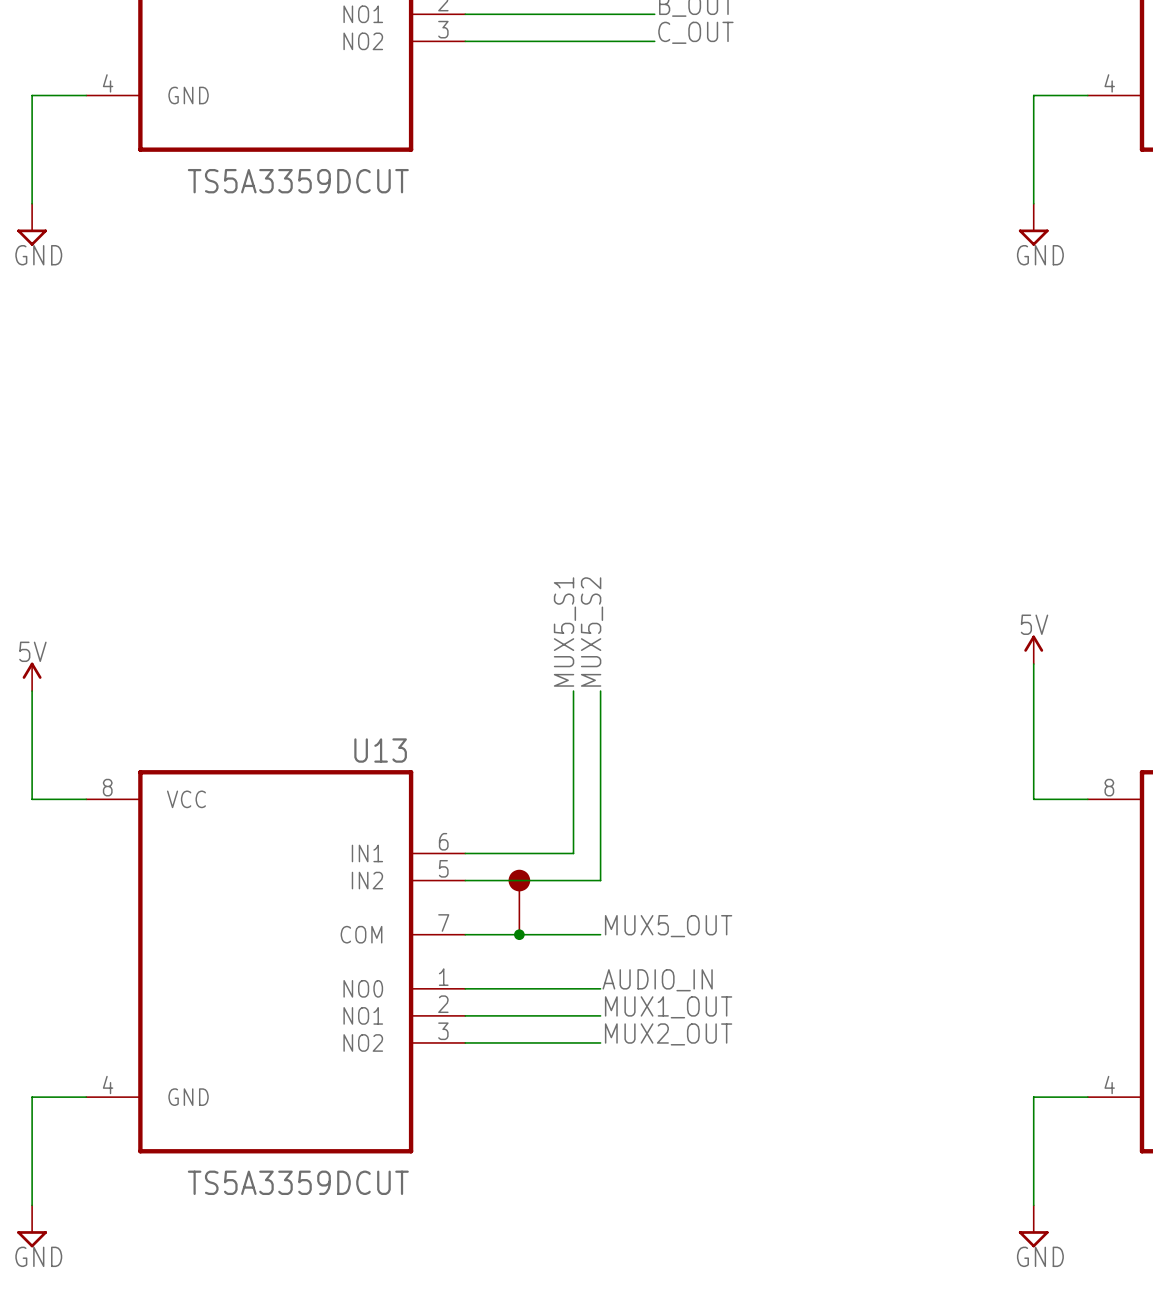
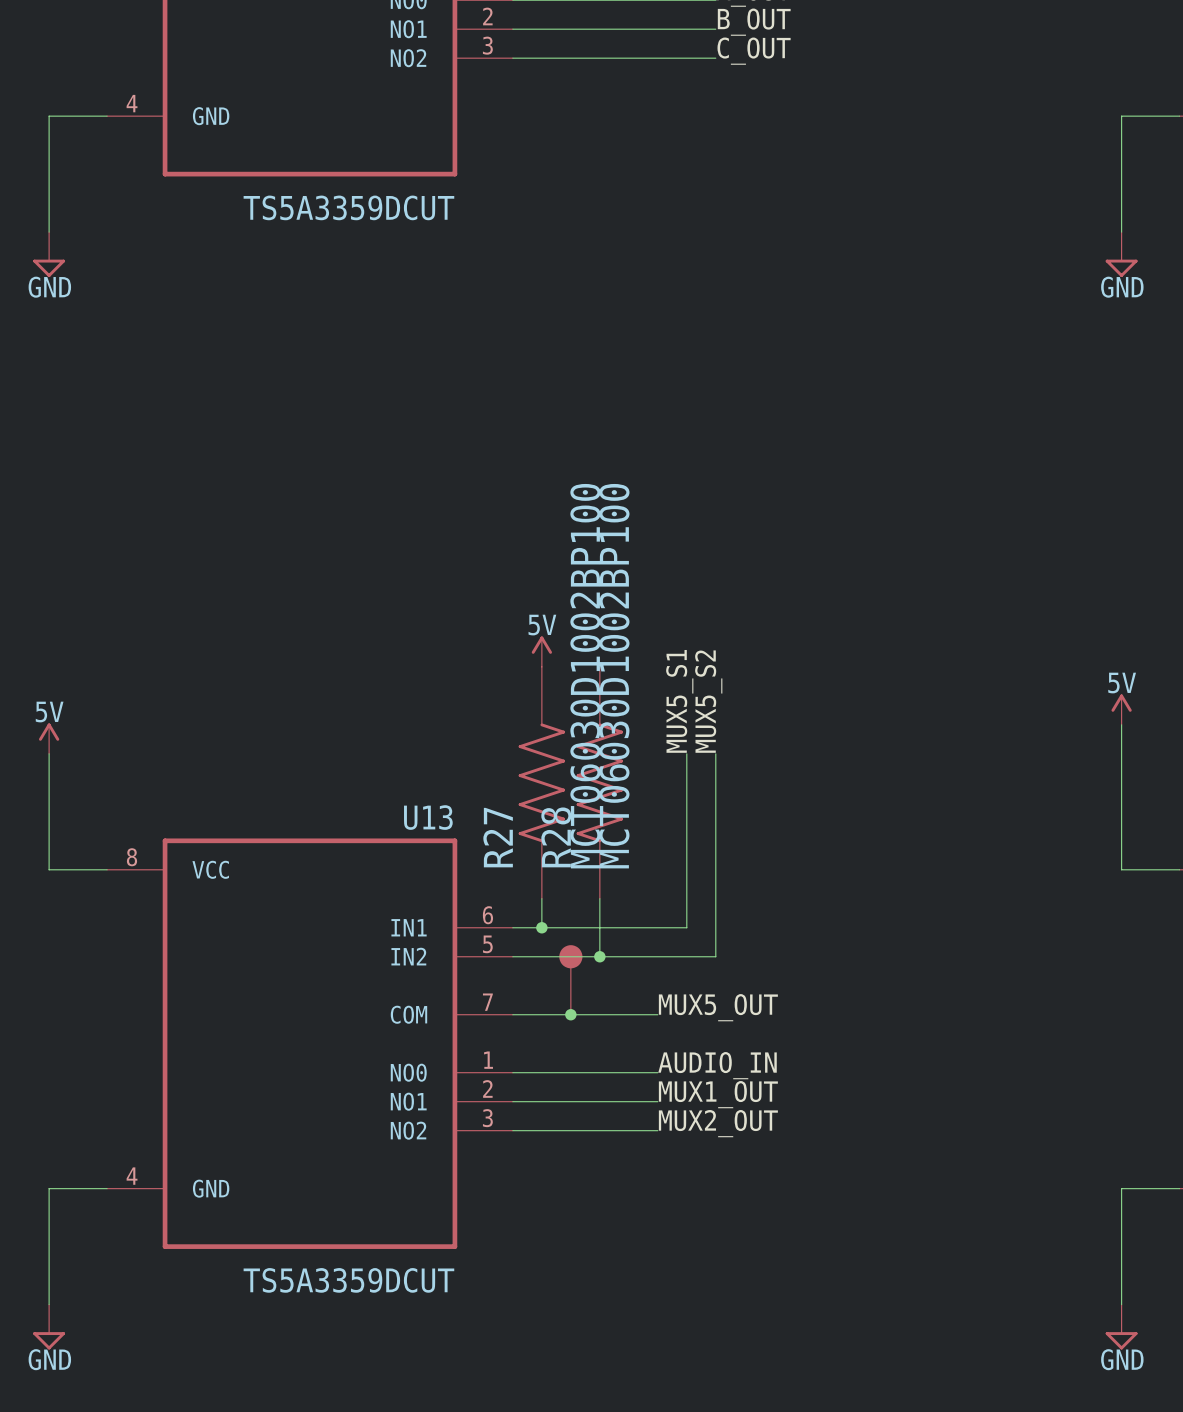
power symbol: none -> 5V (541, 651)
label position: MUX5_S1 (564, 632) -> MUX5_S1 (679, 701)
label position: MUX5_S2 (592, 632) -> MUX5_S2 (708, 701)
wire: (573, 691) (573, 853) -> (686, 753) (686, 927) (628, 927)
wire: (600, 691) (600, 880) -> (715, 753) (715, 956) (657, 956)
R27: none -> MCT06030D1002BP100 (541, 782)
R28: none -> MCT06030D1002BP100 (599, 782)
wire: none -> (541, 898) (541, 927)
wire: none -> (599, 898) (599, 956)
junction: none -> (541, 927)
junction: none -> (599, 956)

